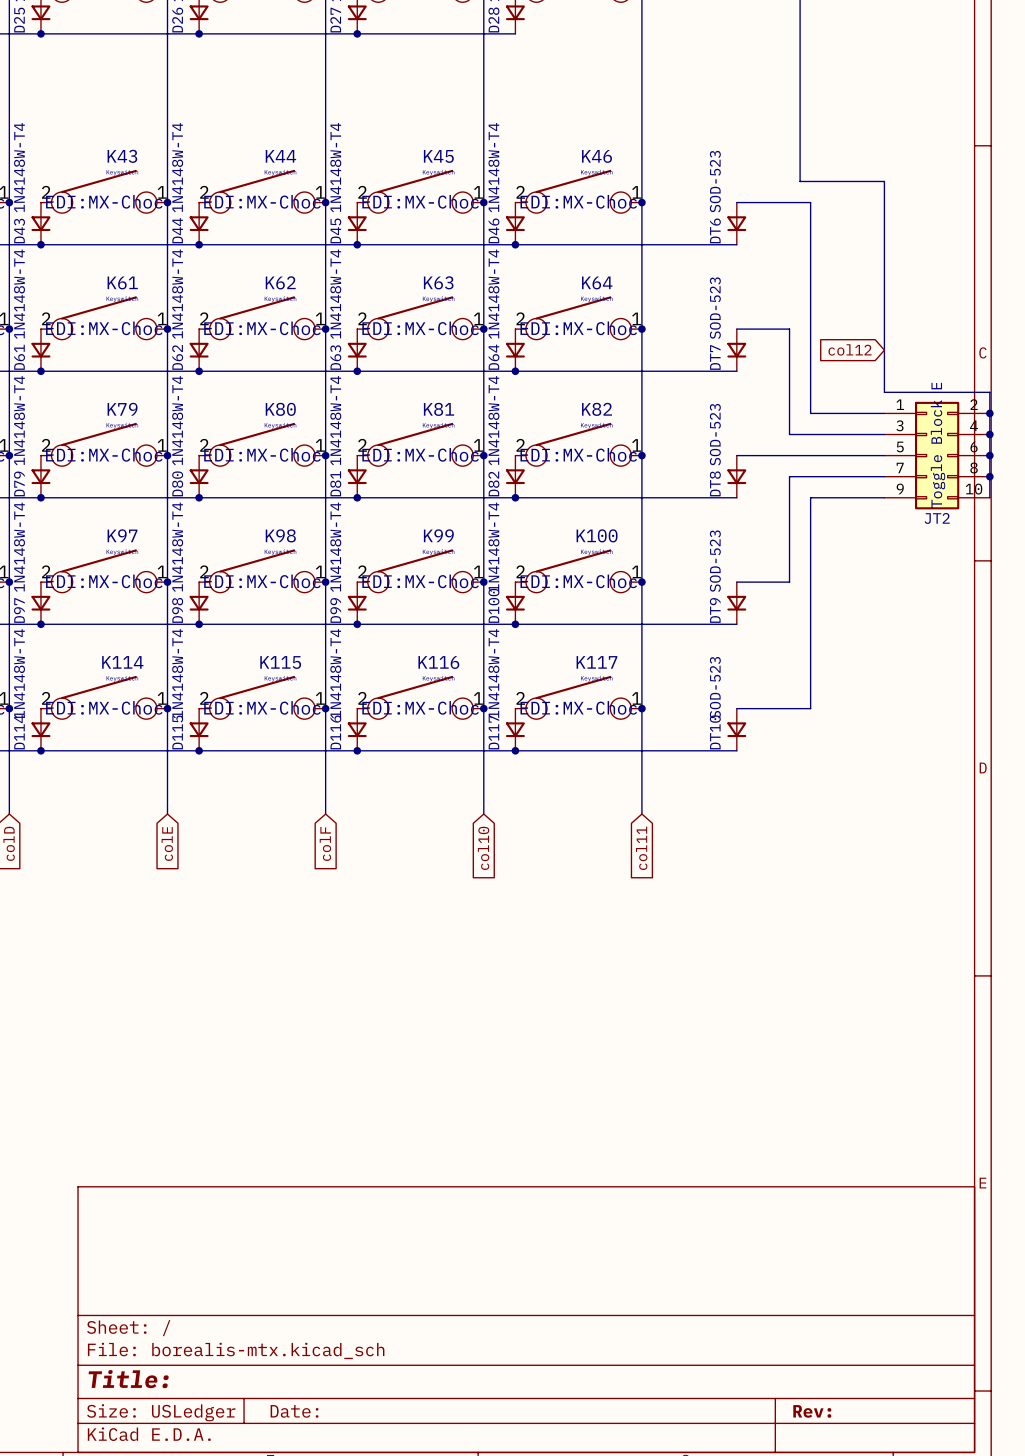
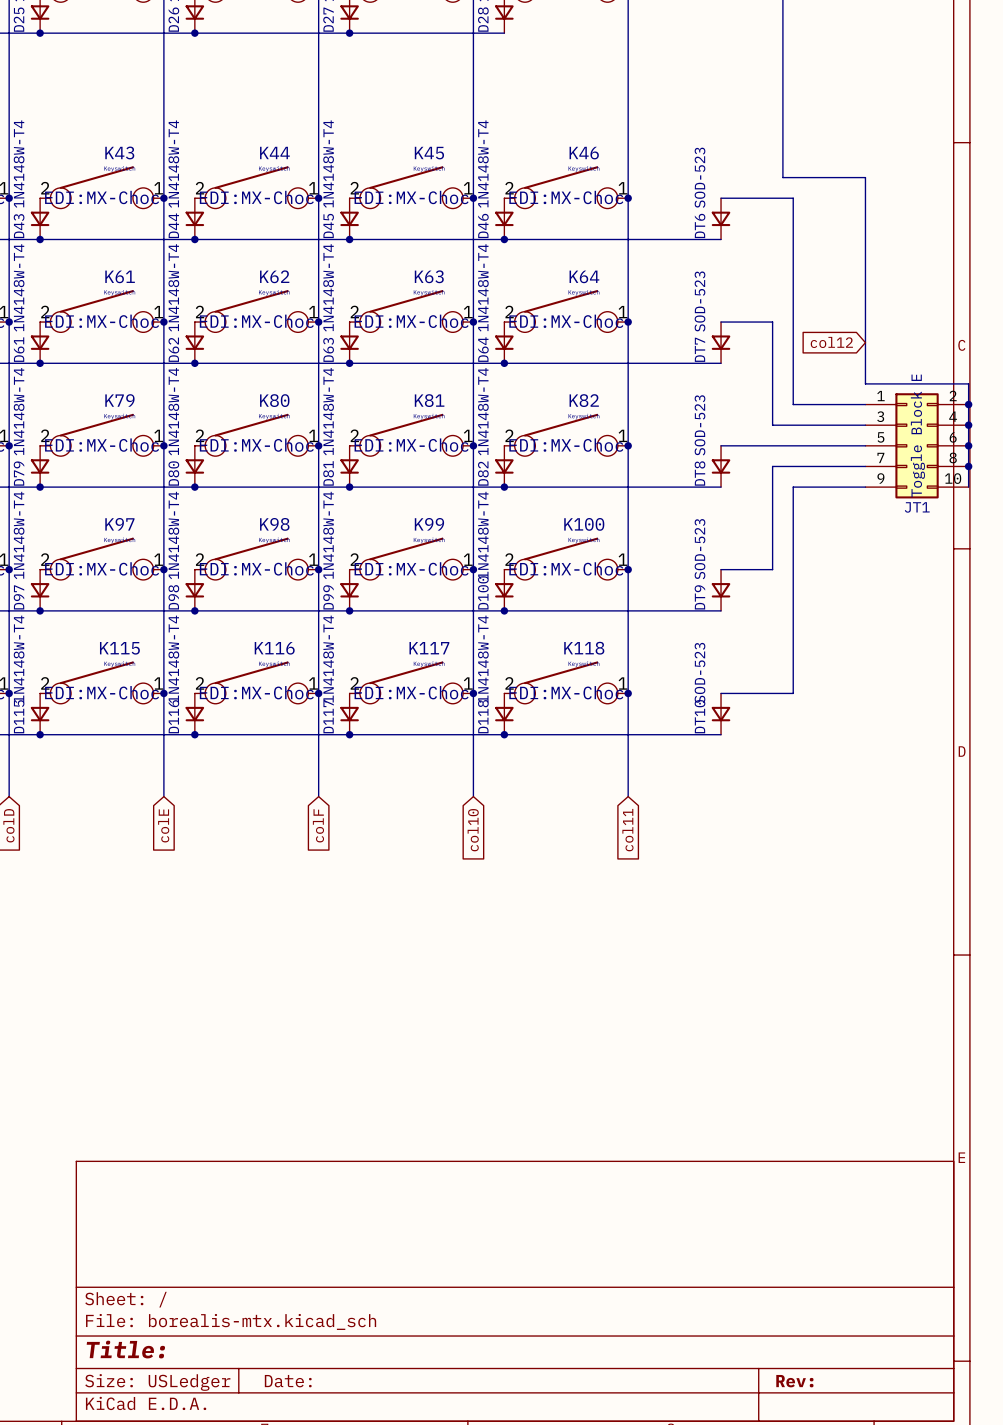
JT2 name: JT2 (937, 518) -> JT1 (917, 507)
K114 name: K114 (122, 662) -> K115 (119, 648)
K115 name: K115 (280, 662) -> K116 (274, 648)
K116 name: K116 (438, 662) -> K117 (429, 648)
K117 name: K117 (596, 662) -> K118 (584, 648)
D114 name: D114 (19, 732) -> D115 (19, 716)
D115 name: D115 (177, 732) -> D116 (173, 716)
D116 name: D116 (335, 732) -> D117 (328, 716)
D117 name: D117 (493, 732) -> D118 (483, 716)

